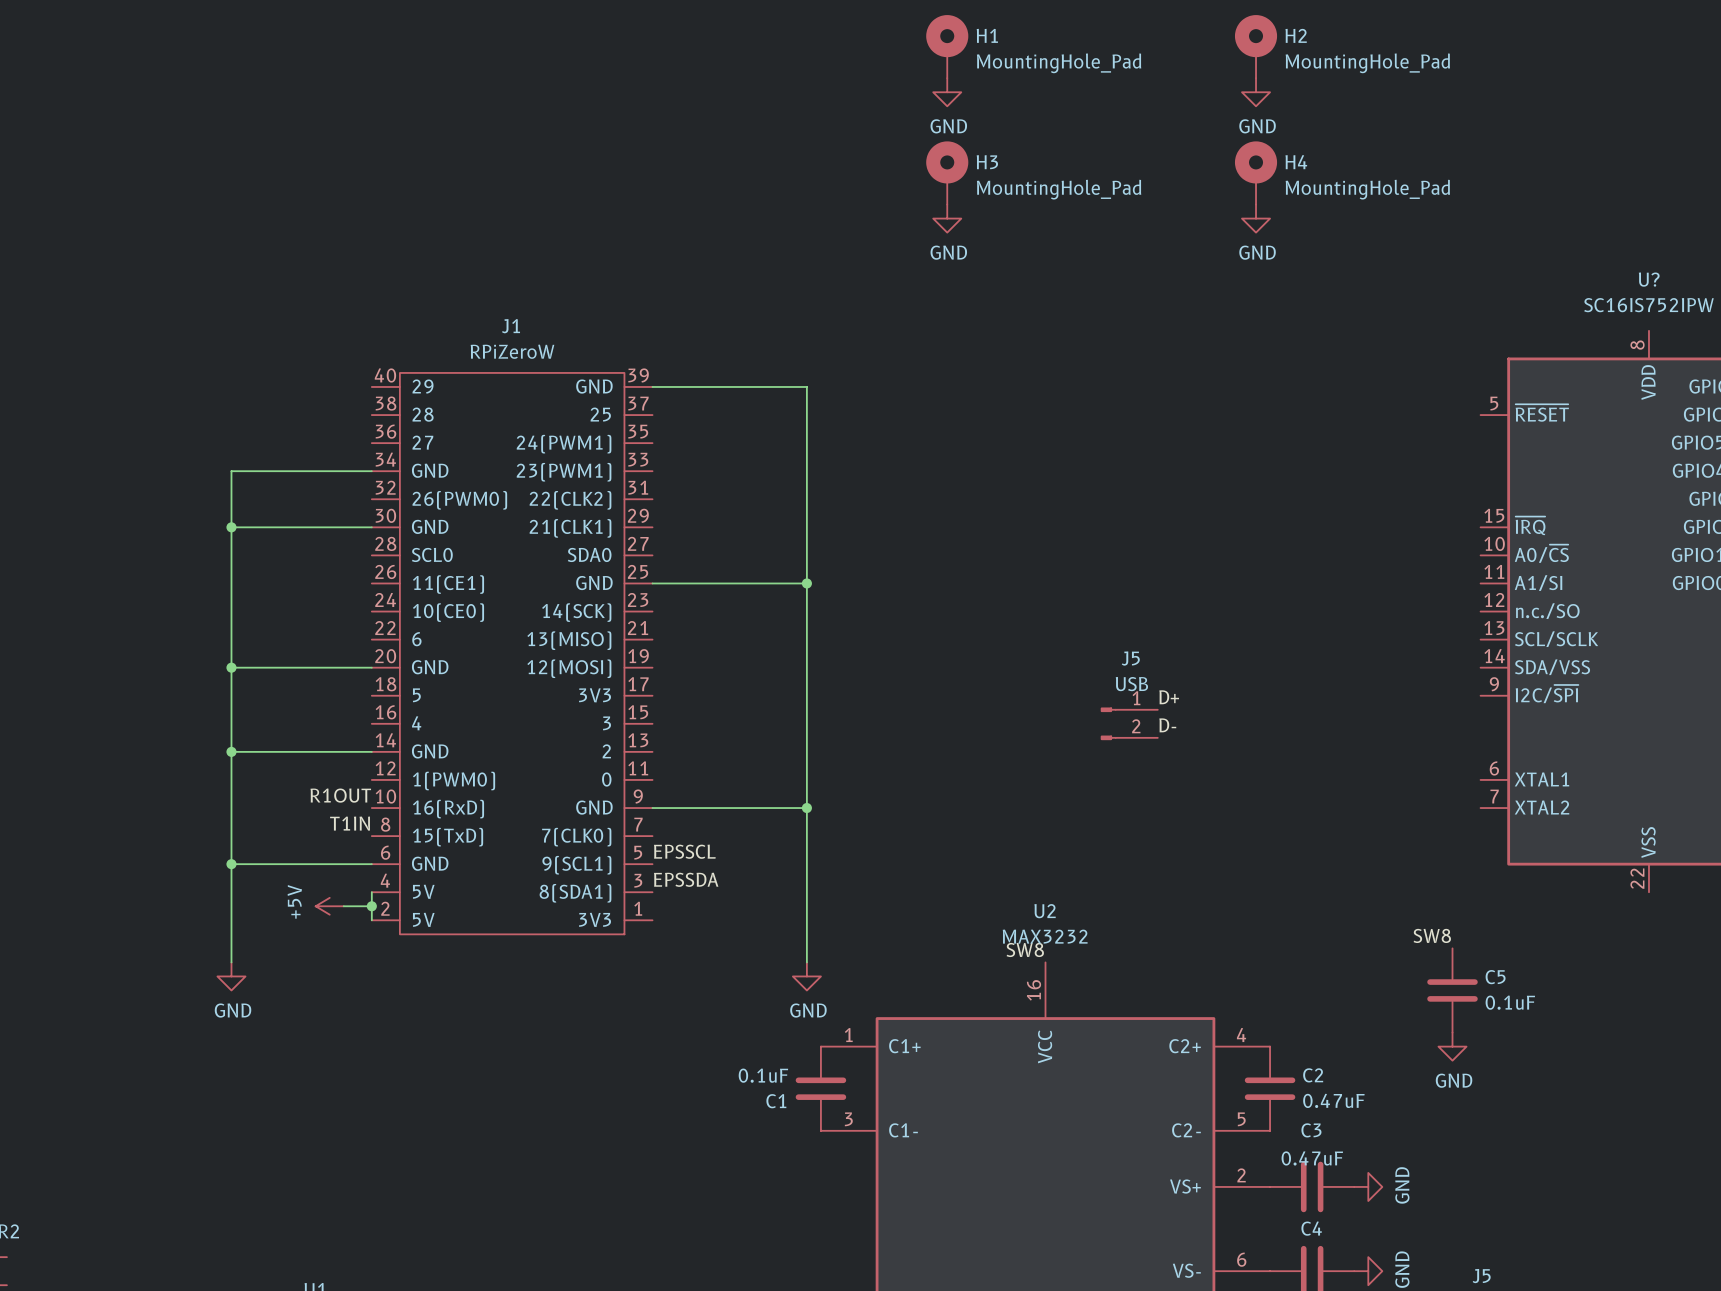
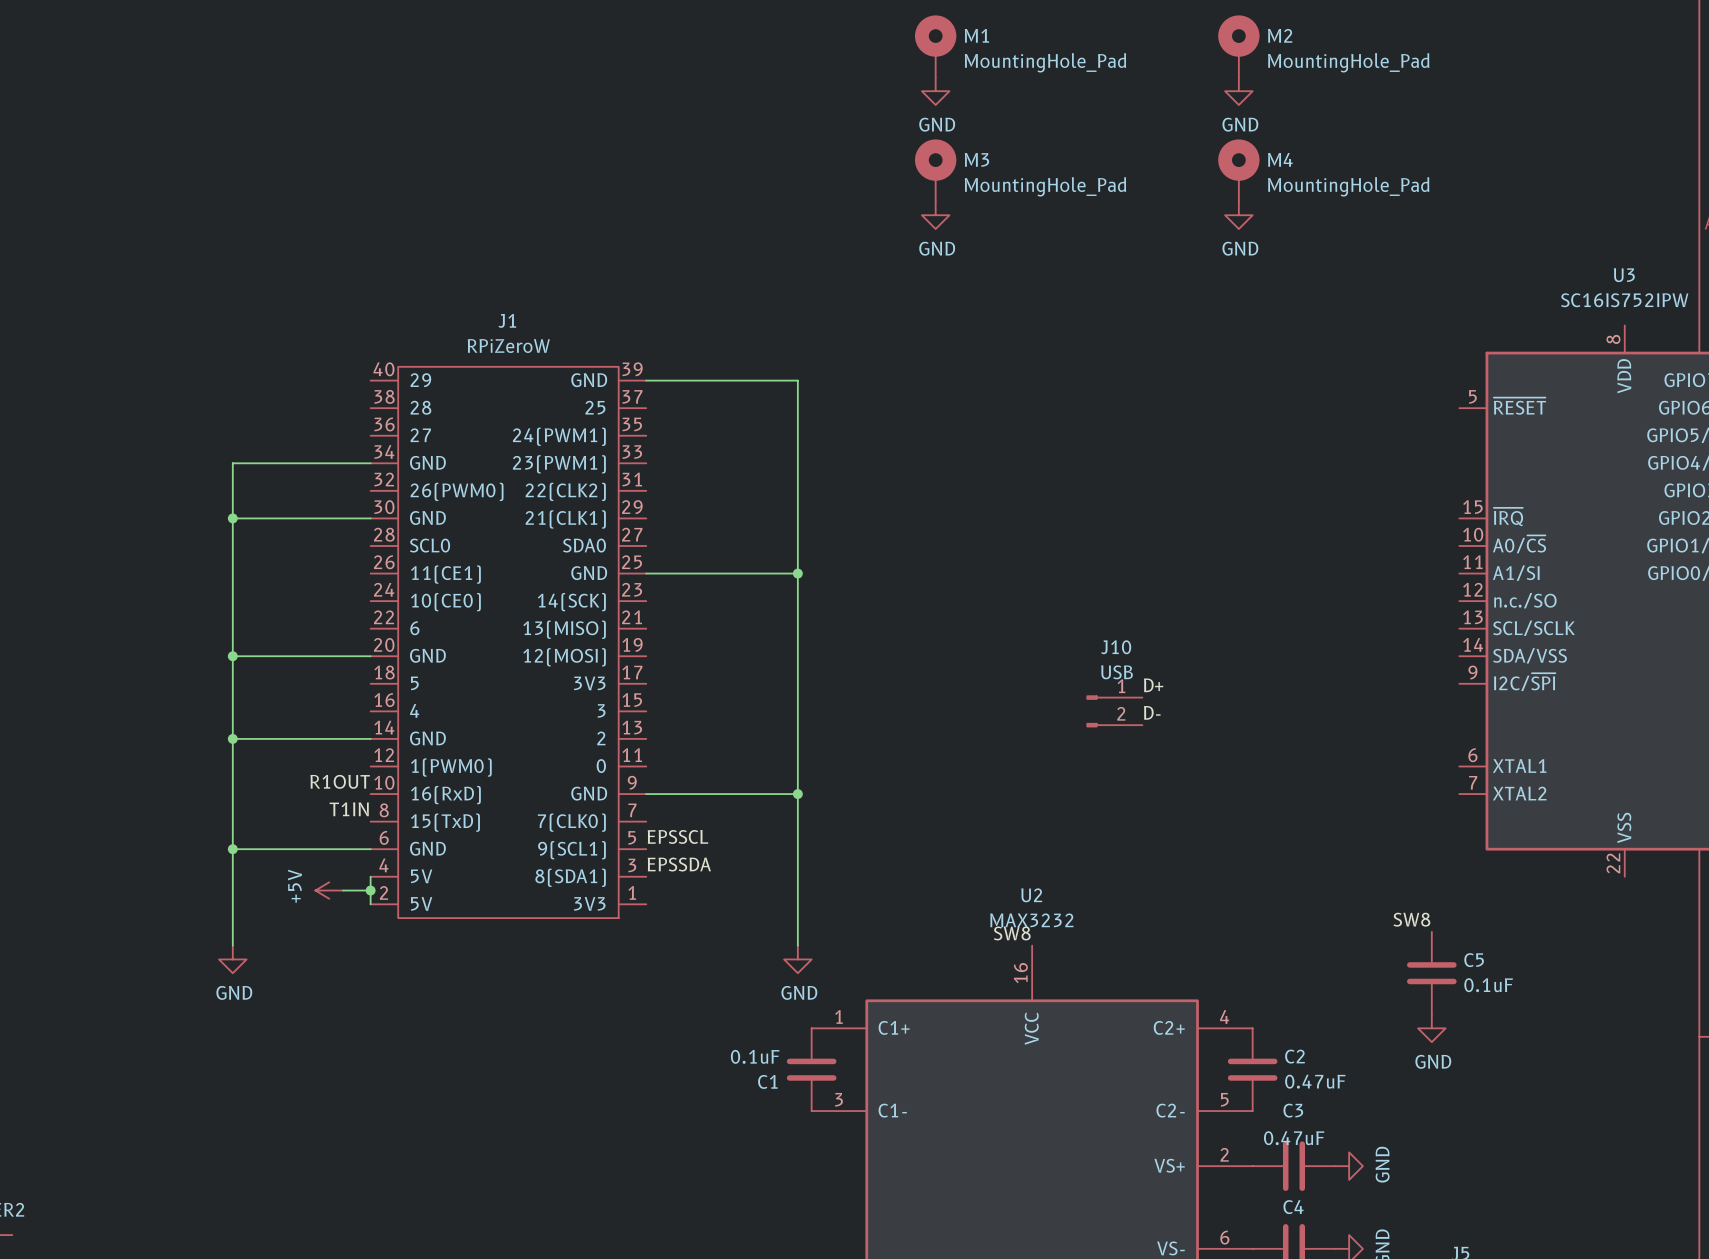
H1 name: H1 (987, 35) -> M1 (976, 35)
H2 name: H2 (1296, 35) -> M2 (1280, 35)
H3 name: H3 (987, 162) -> M3 (976, 159)
H4 name: H4 (1296, 162) -> M4 (1280, 159)
U? name: U? (1649, 279) -> U3 (1624, 275)
J5 name: J5 (1130, 658) -> J10 (1116, 647)

